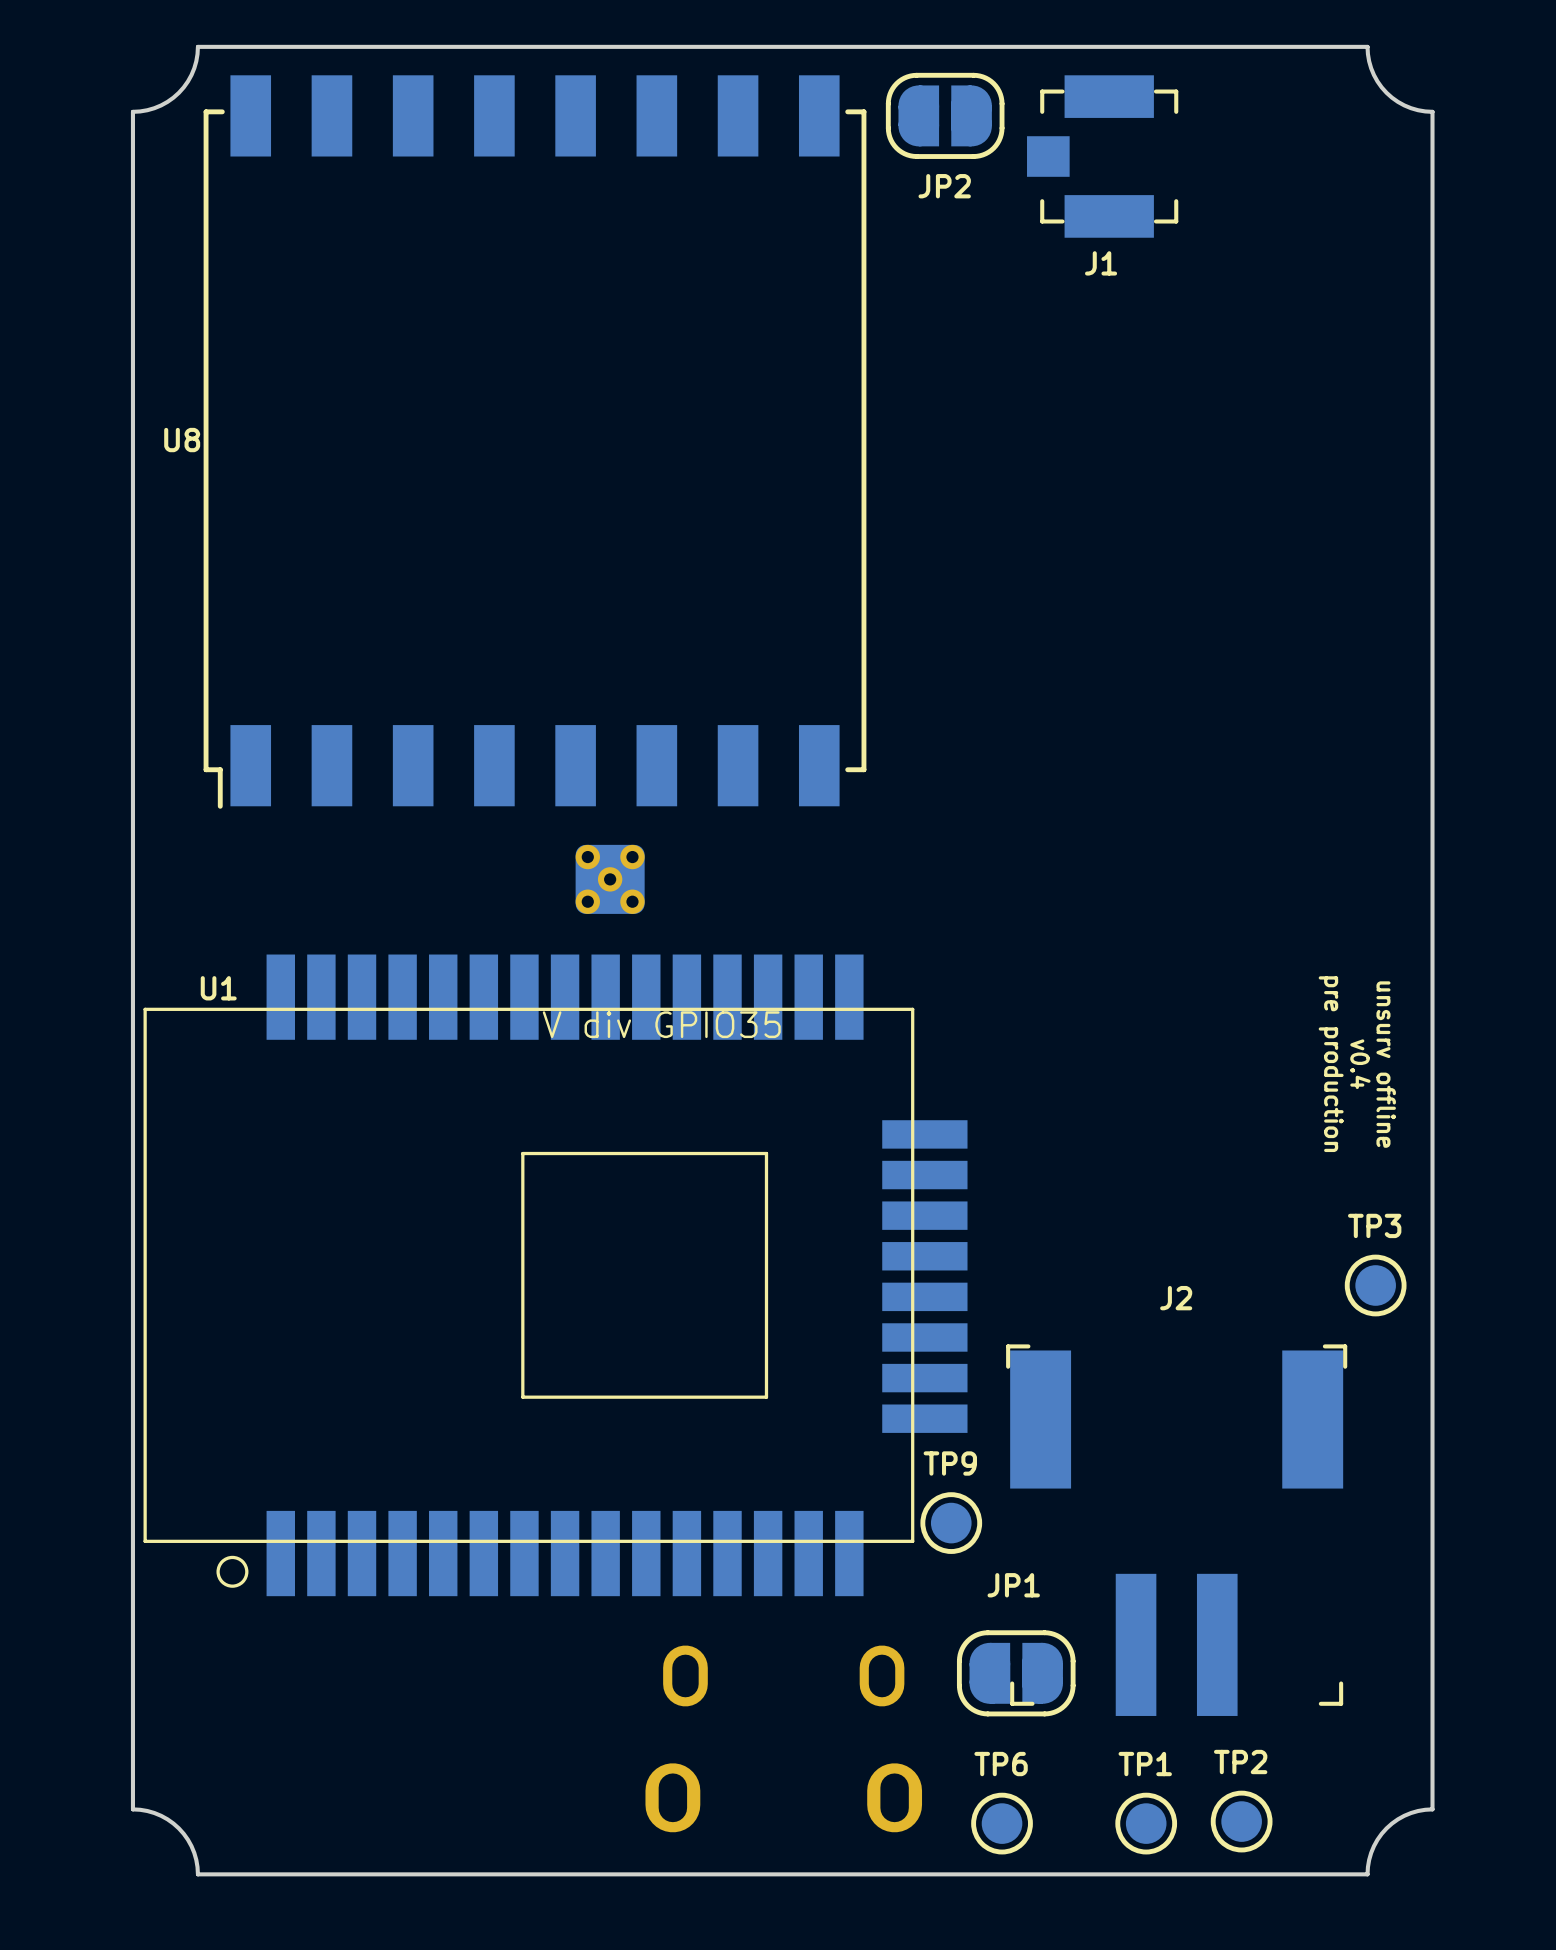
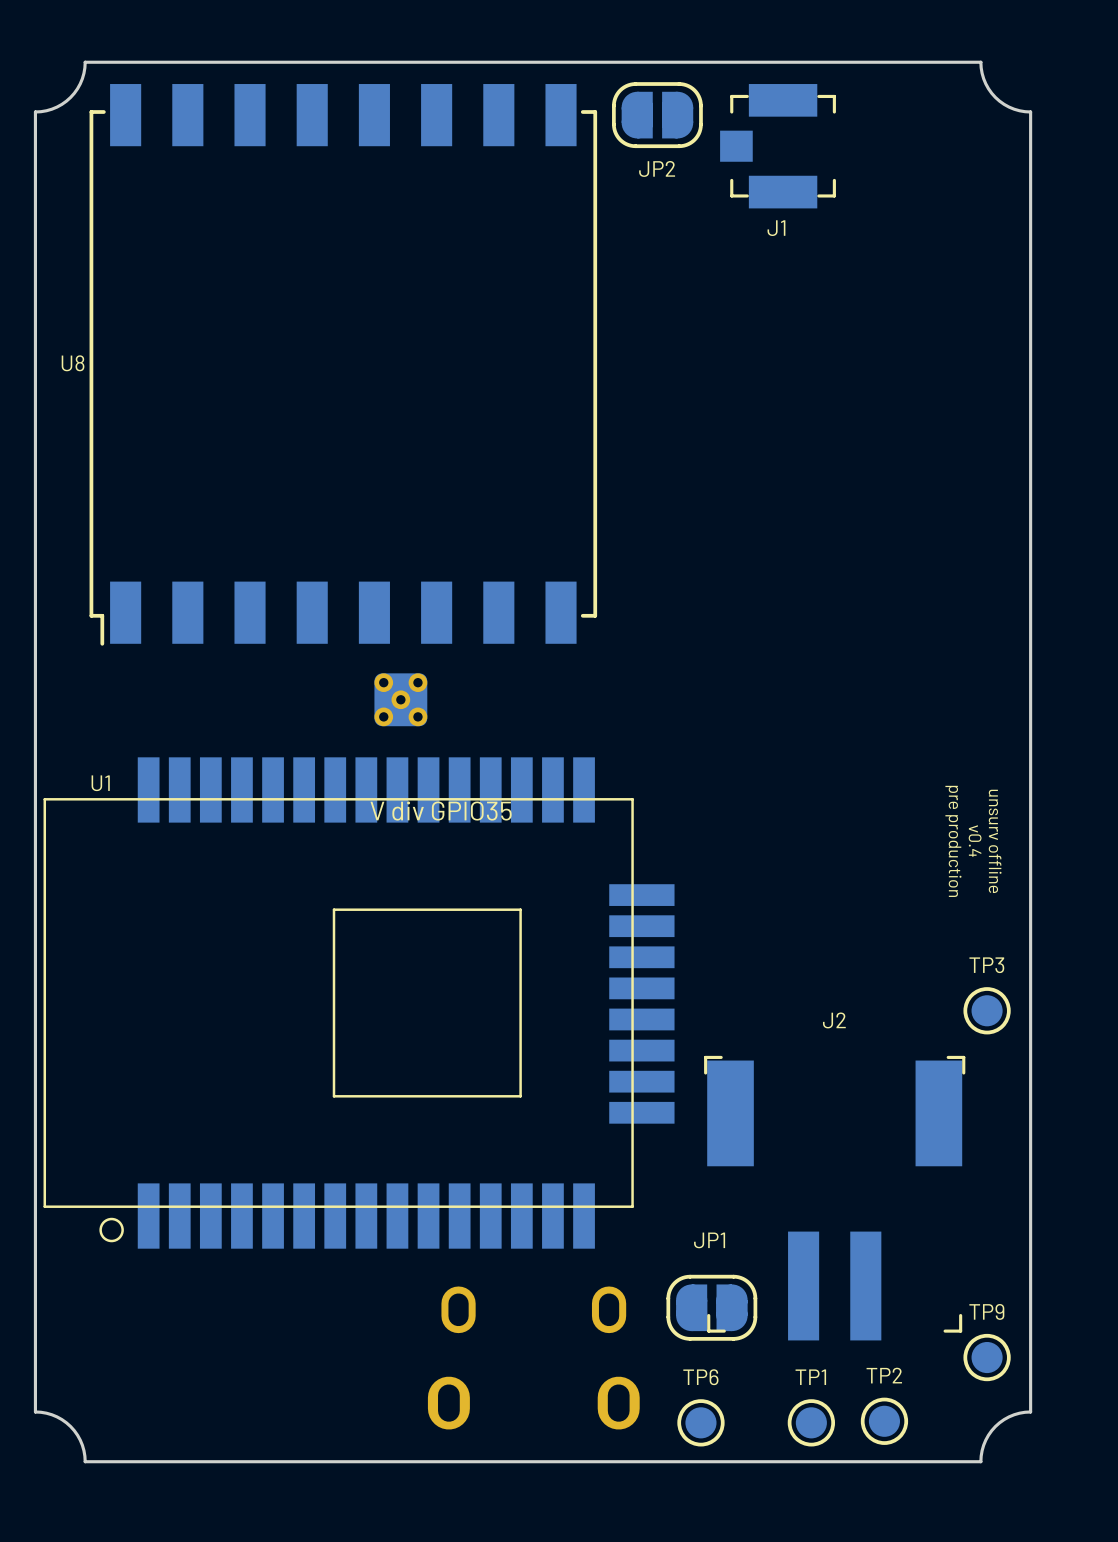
TP9 position: (951, 1523) -> (987, 1357)

